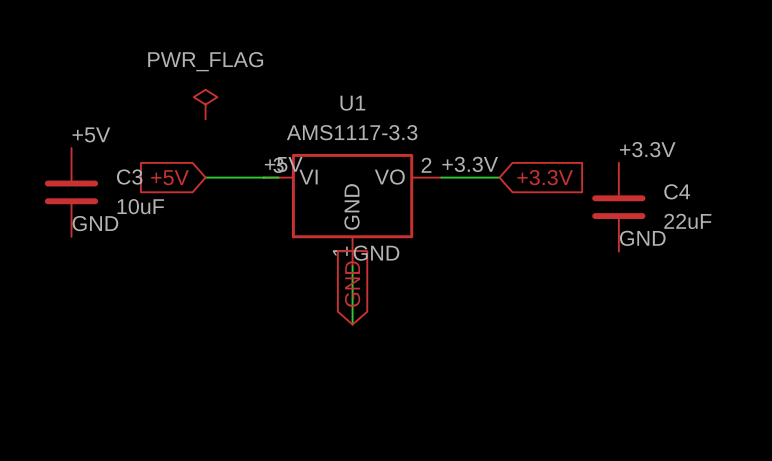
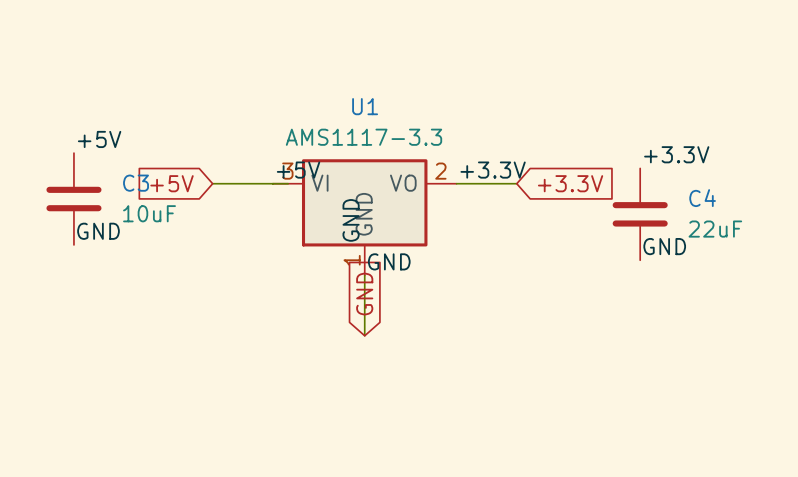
power symbol: PWR_FLAG (205, 104) -> none
label: none -> GND (351, 220)

